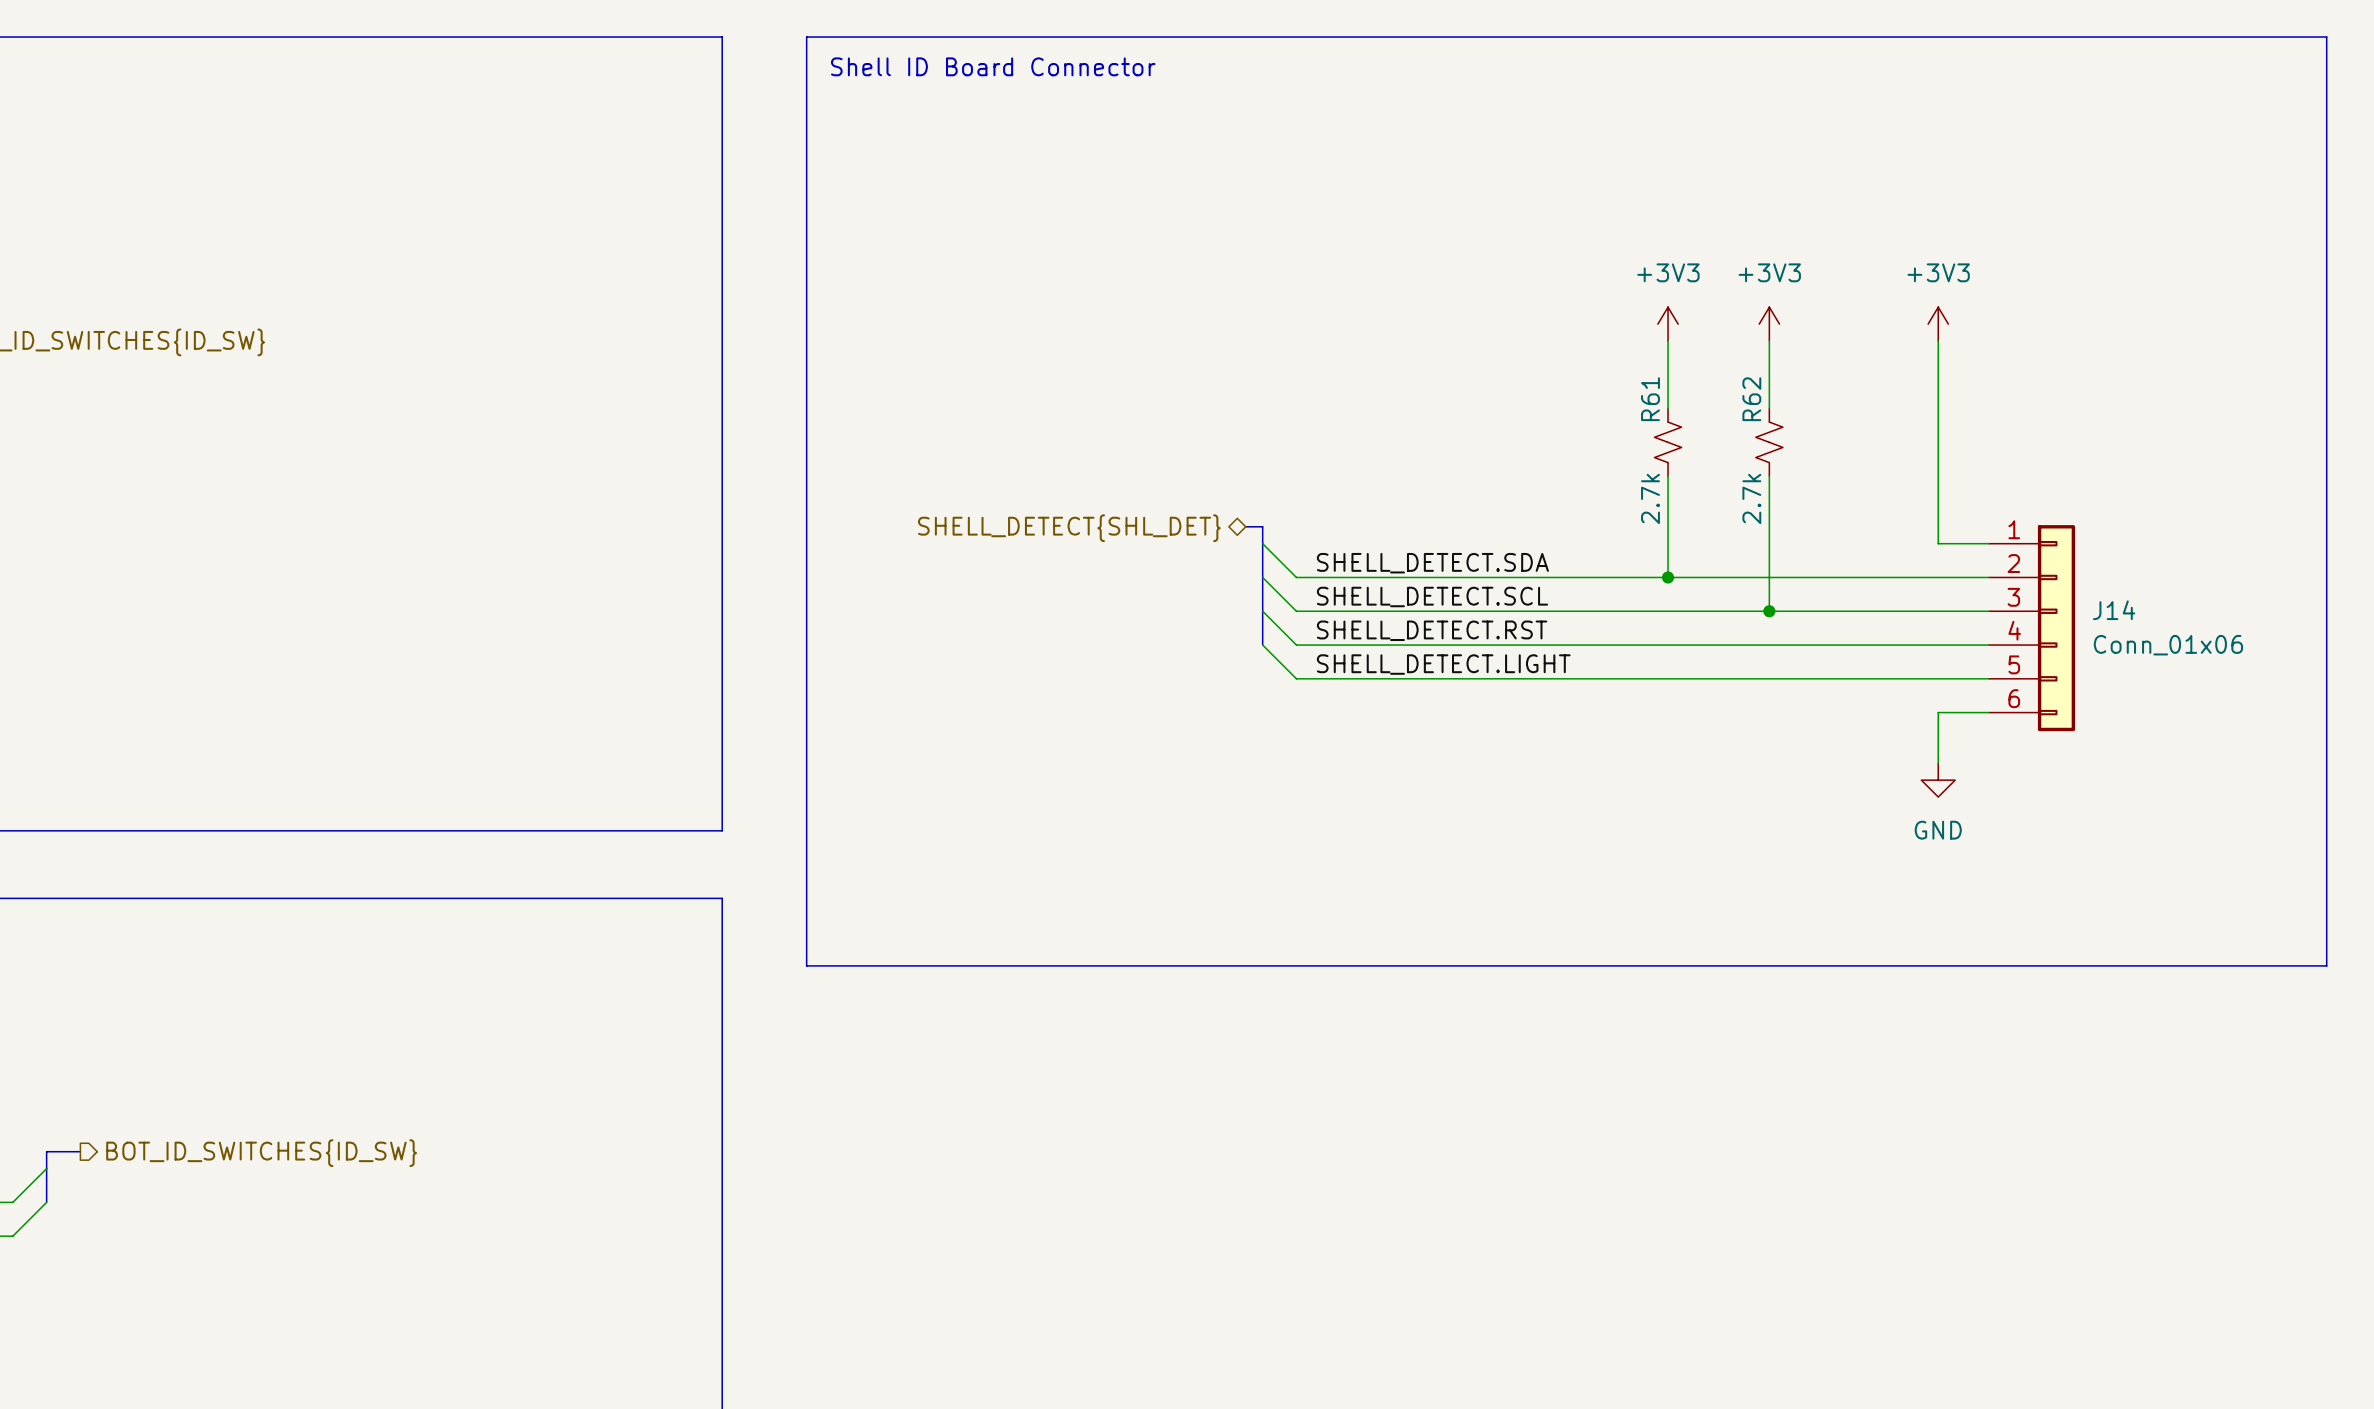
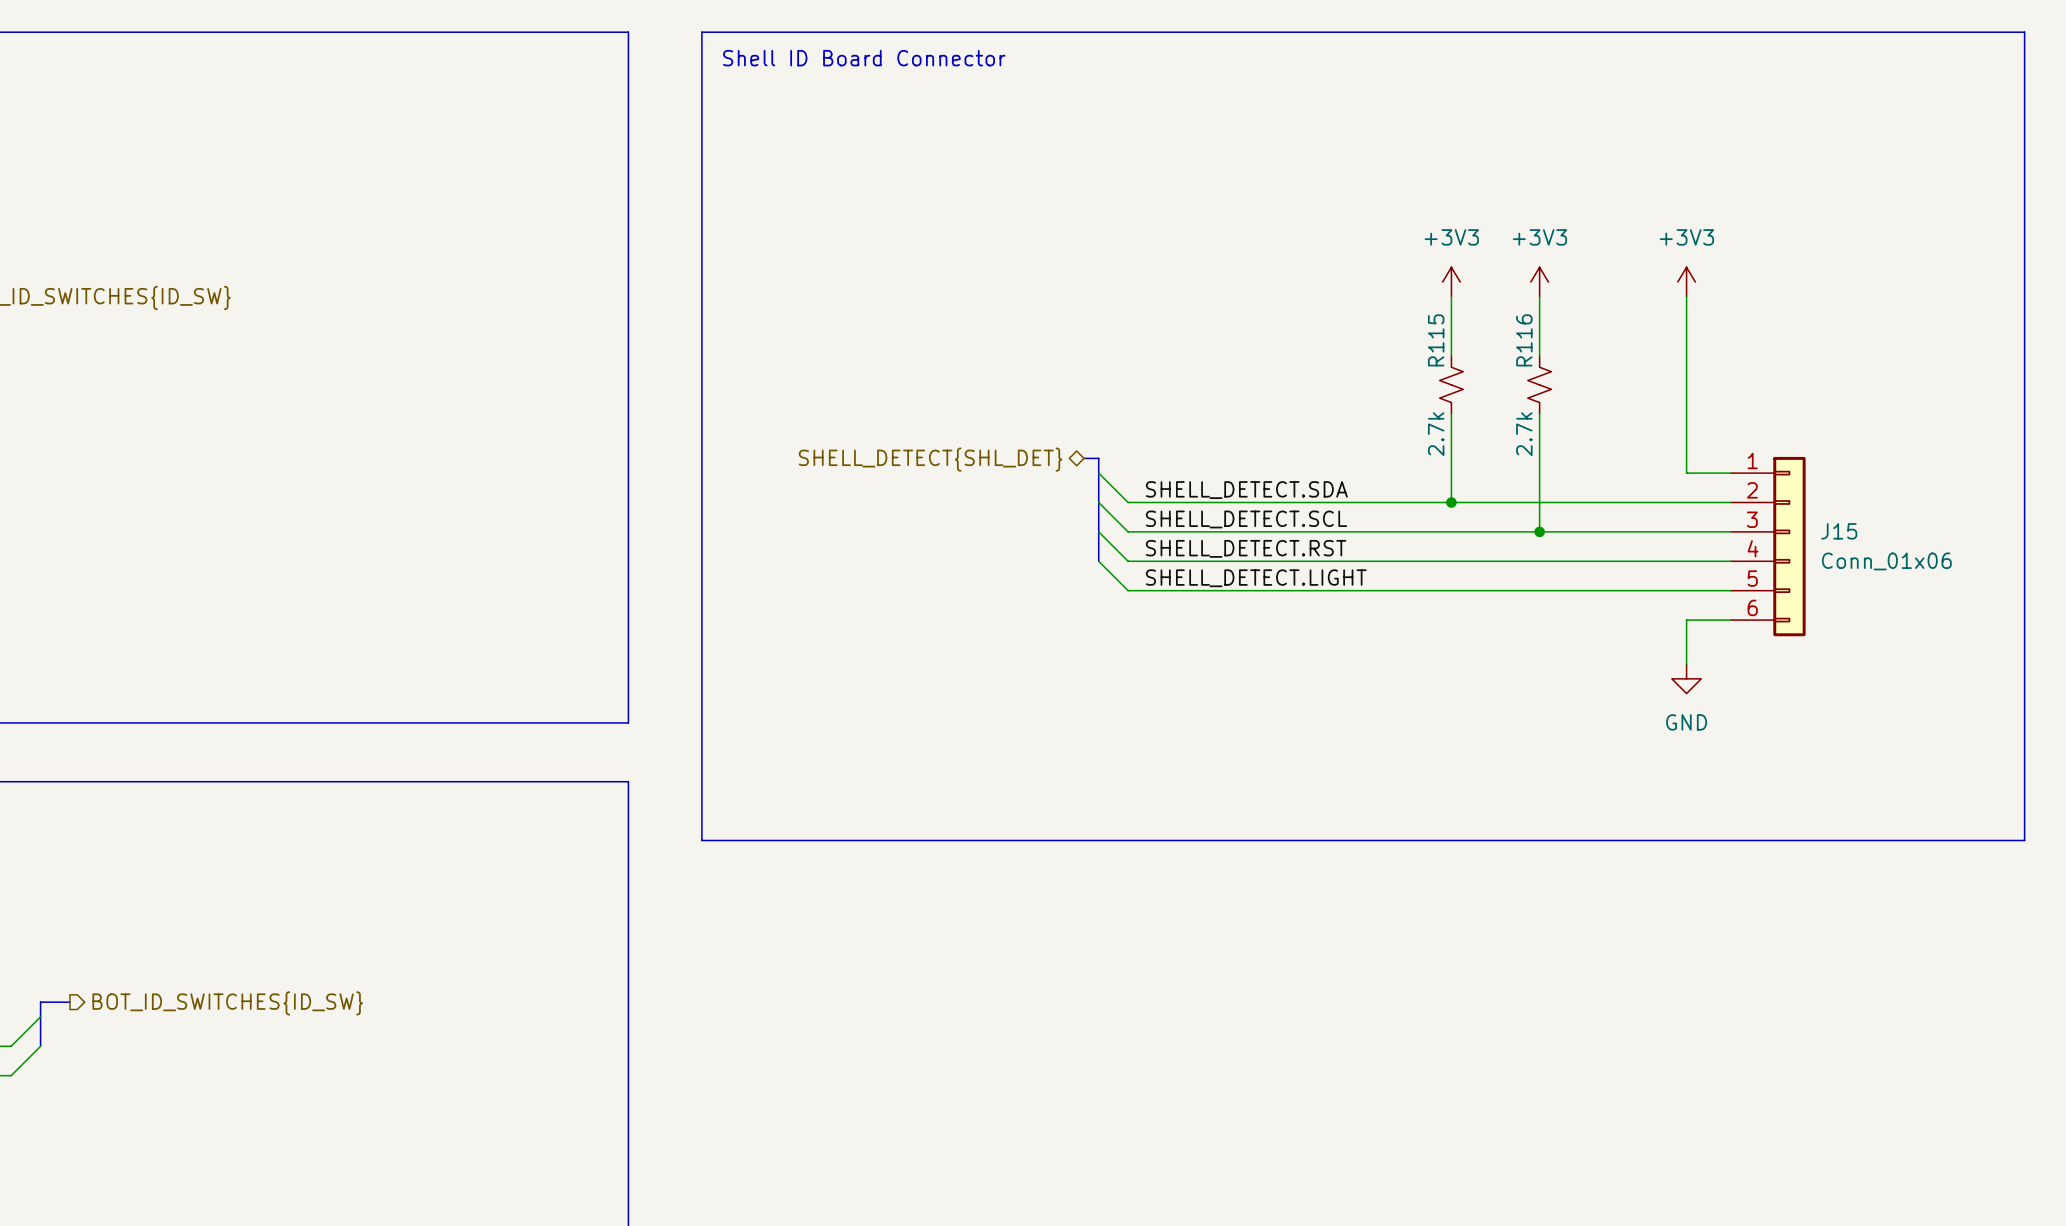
R61 name: R61 (1650, 399) -> R115 (1436, 340)
R62 name: R62 (1751, 399) -> R116 (1524, 340)
J14 name: J14 (2114, 610) -> J15 (1839, 531)

